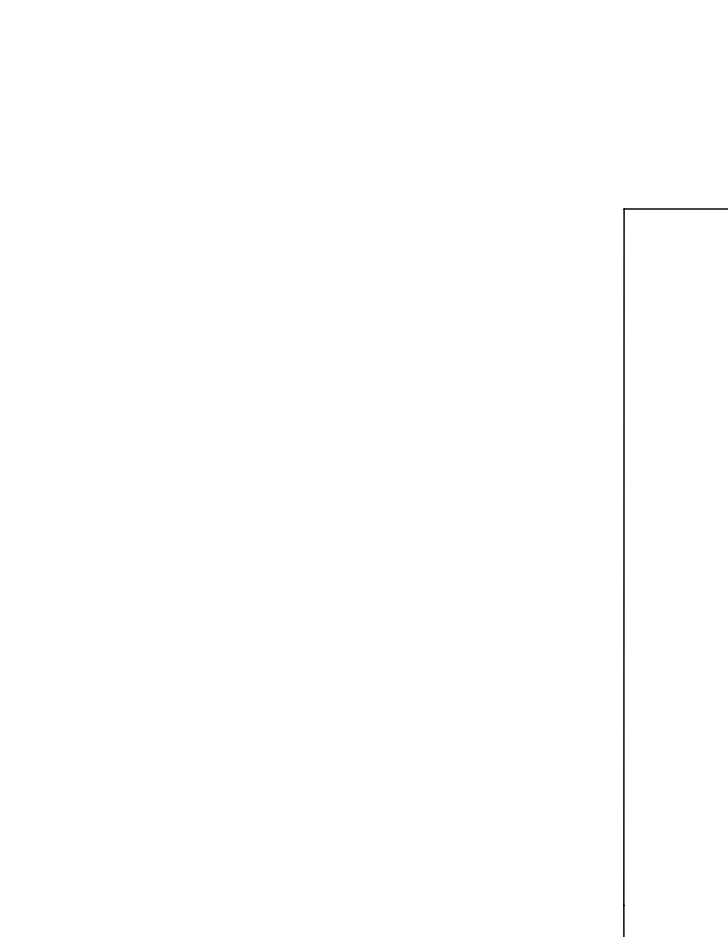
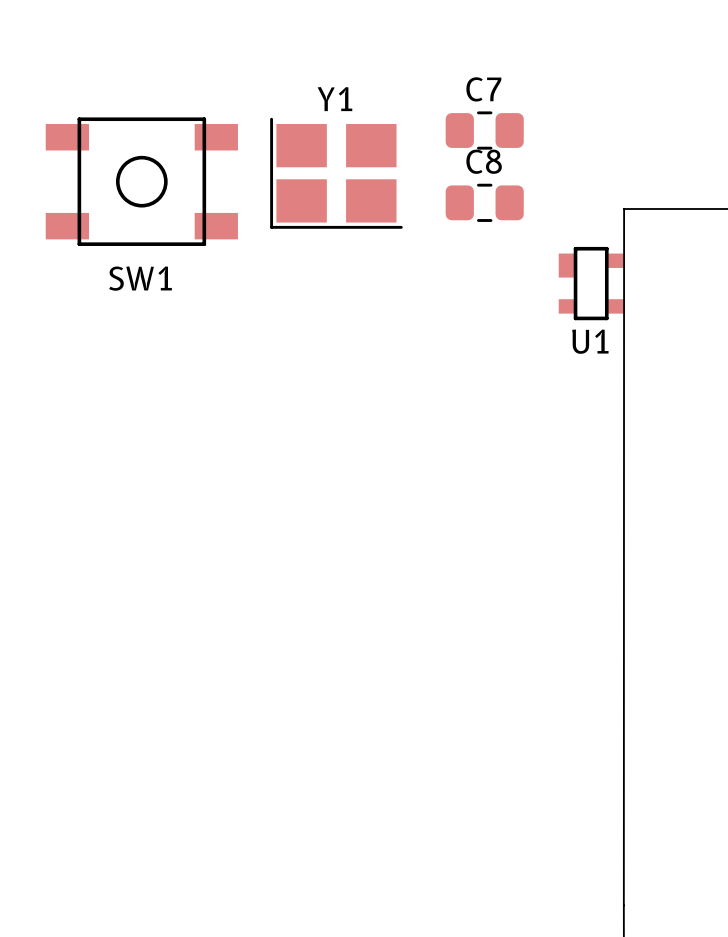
C7: none -> (484, 130)
Y1: none -> (336, 173)
SW1: none -> (141, 181)
C8: none -> (484, 202)
U1: none -> (591, 283)

